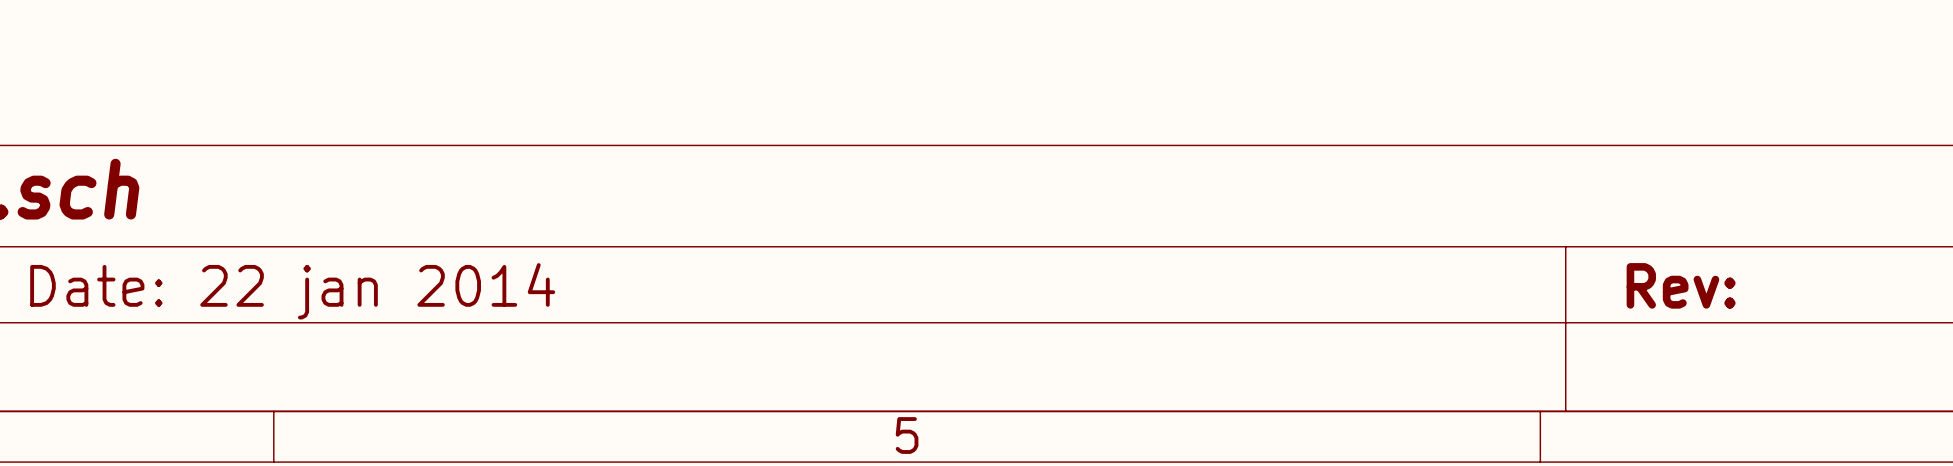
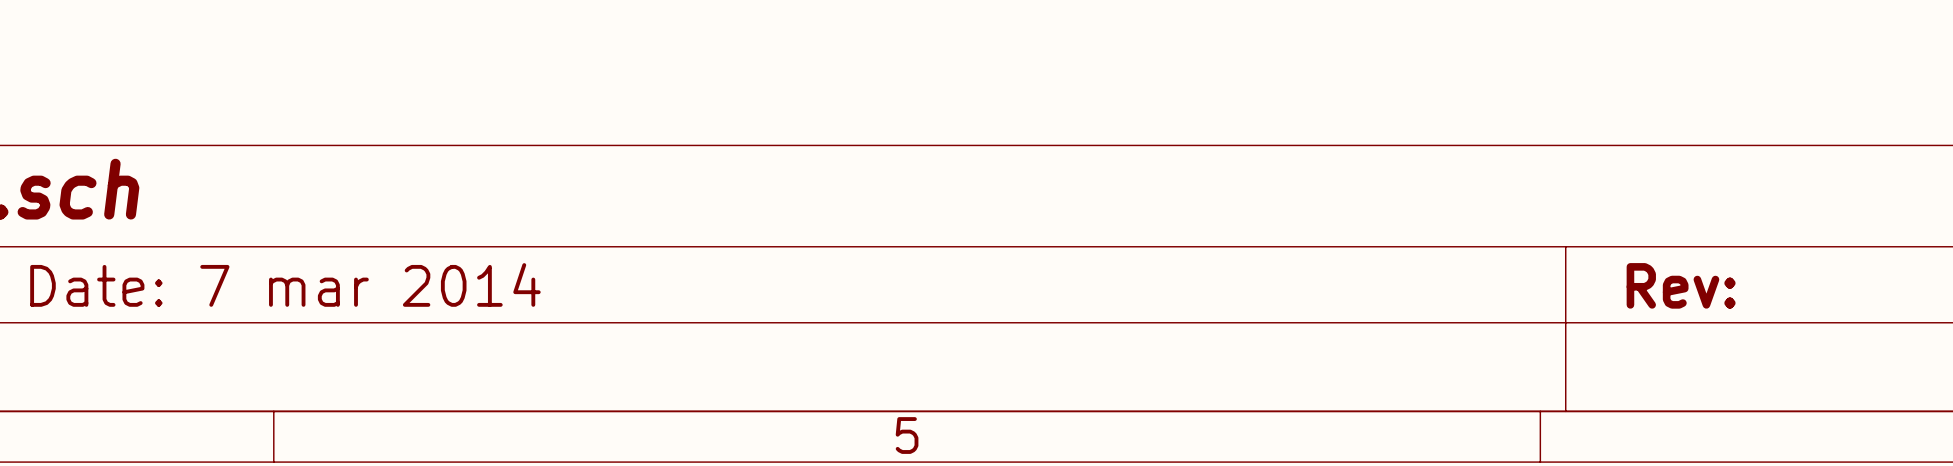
title block: Date: 22 jan 2014 (292, 291) -> Date: 7 mar 2014 (285, 284)

